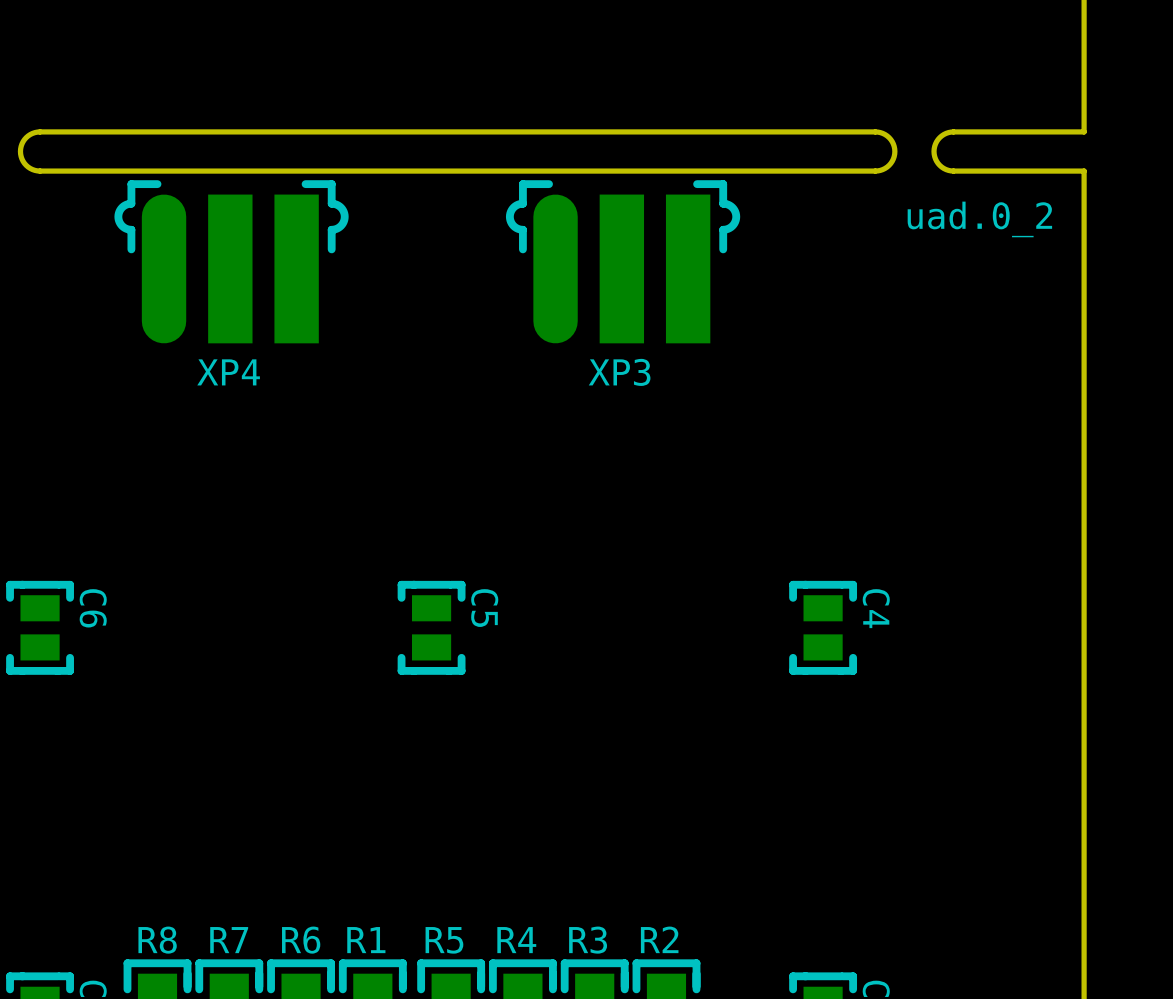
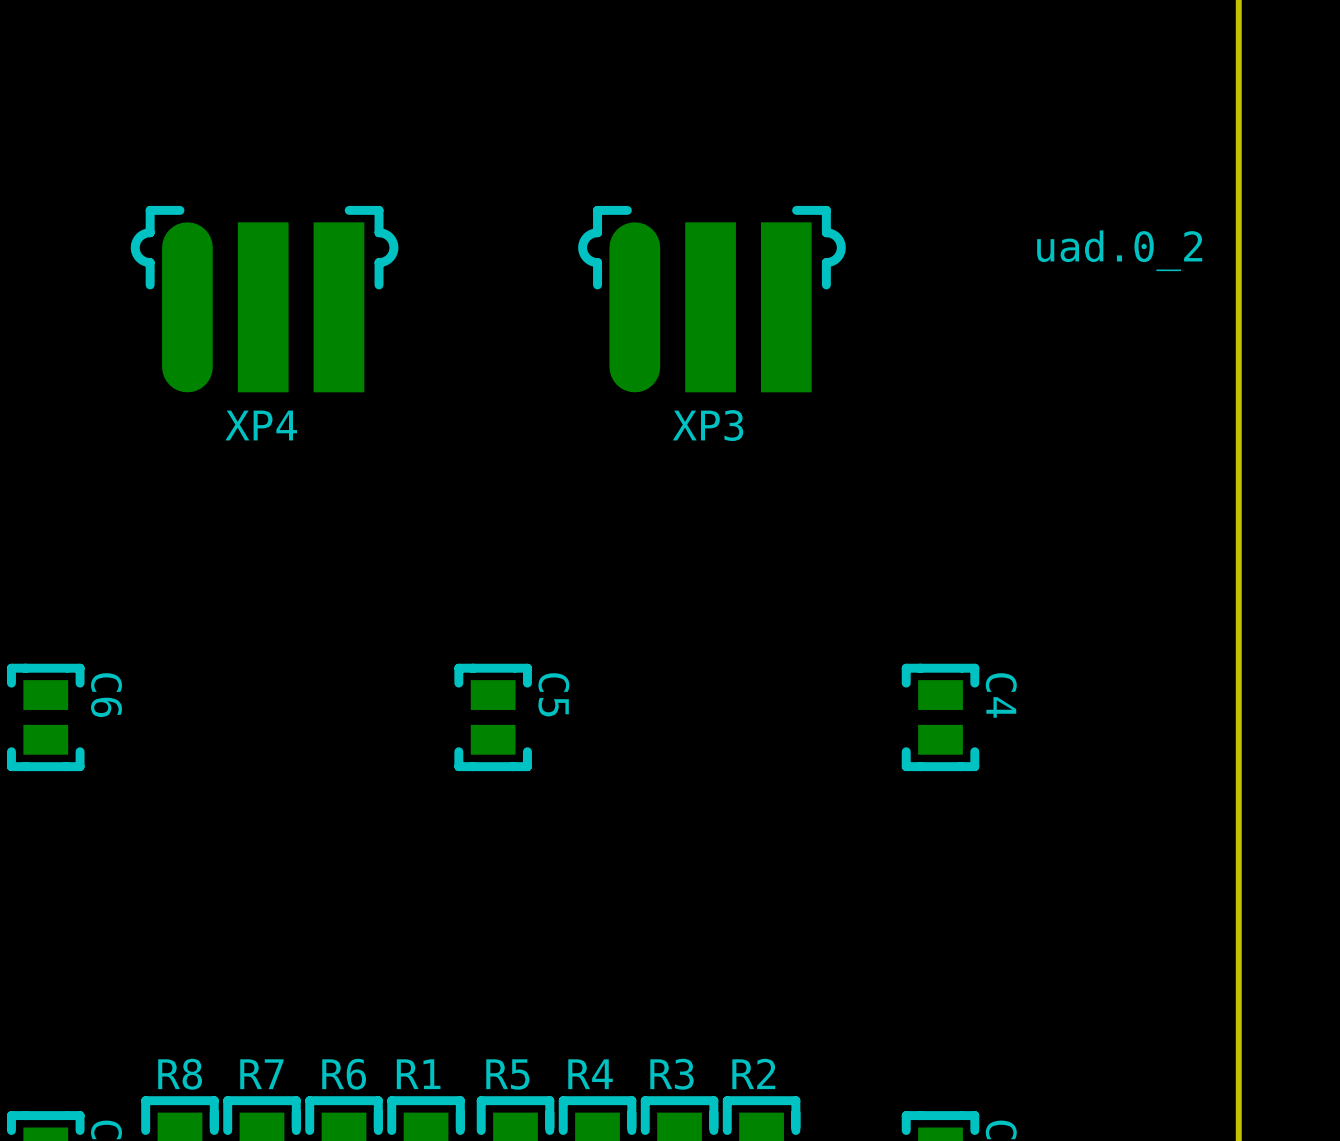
board edge: (875, 131) (40, 131) (26, 137) (20, 151) (26, 165) (40, 171) (875, 171) (889, 165) (894, 151) (889, 137) (875, 131) -> none
board edge: (1084, 131) (951, 132) (938, 139) (934, 151) (938, 163) (951, 170) (1084, 171) -> (1238, 150) (1238, 195)

